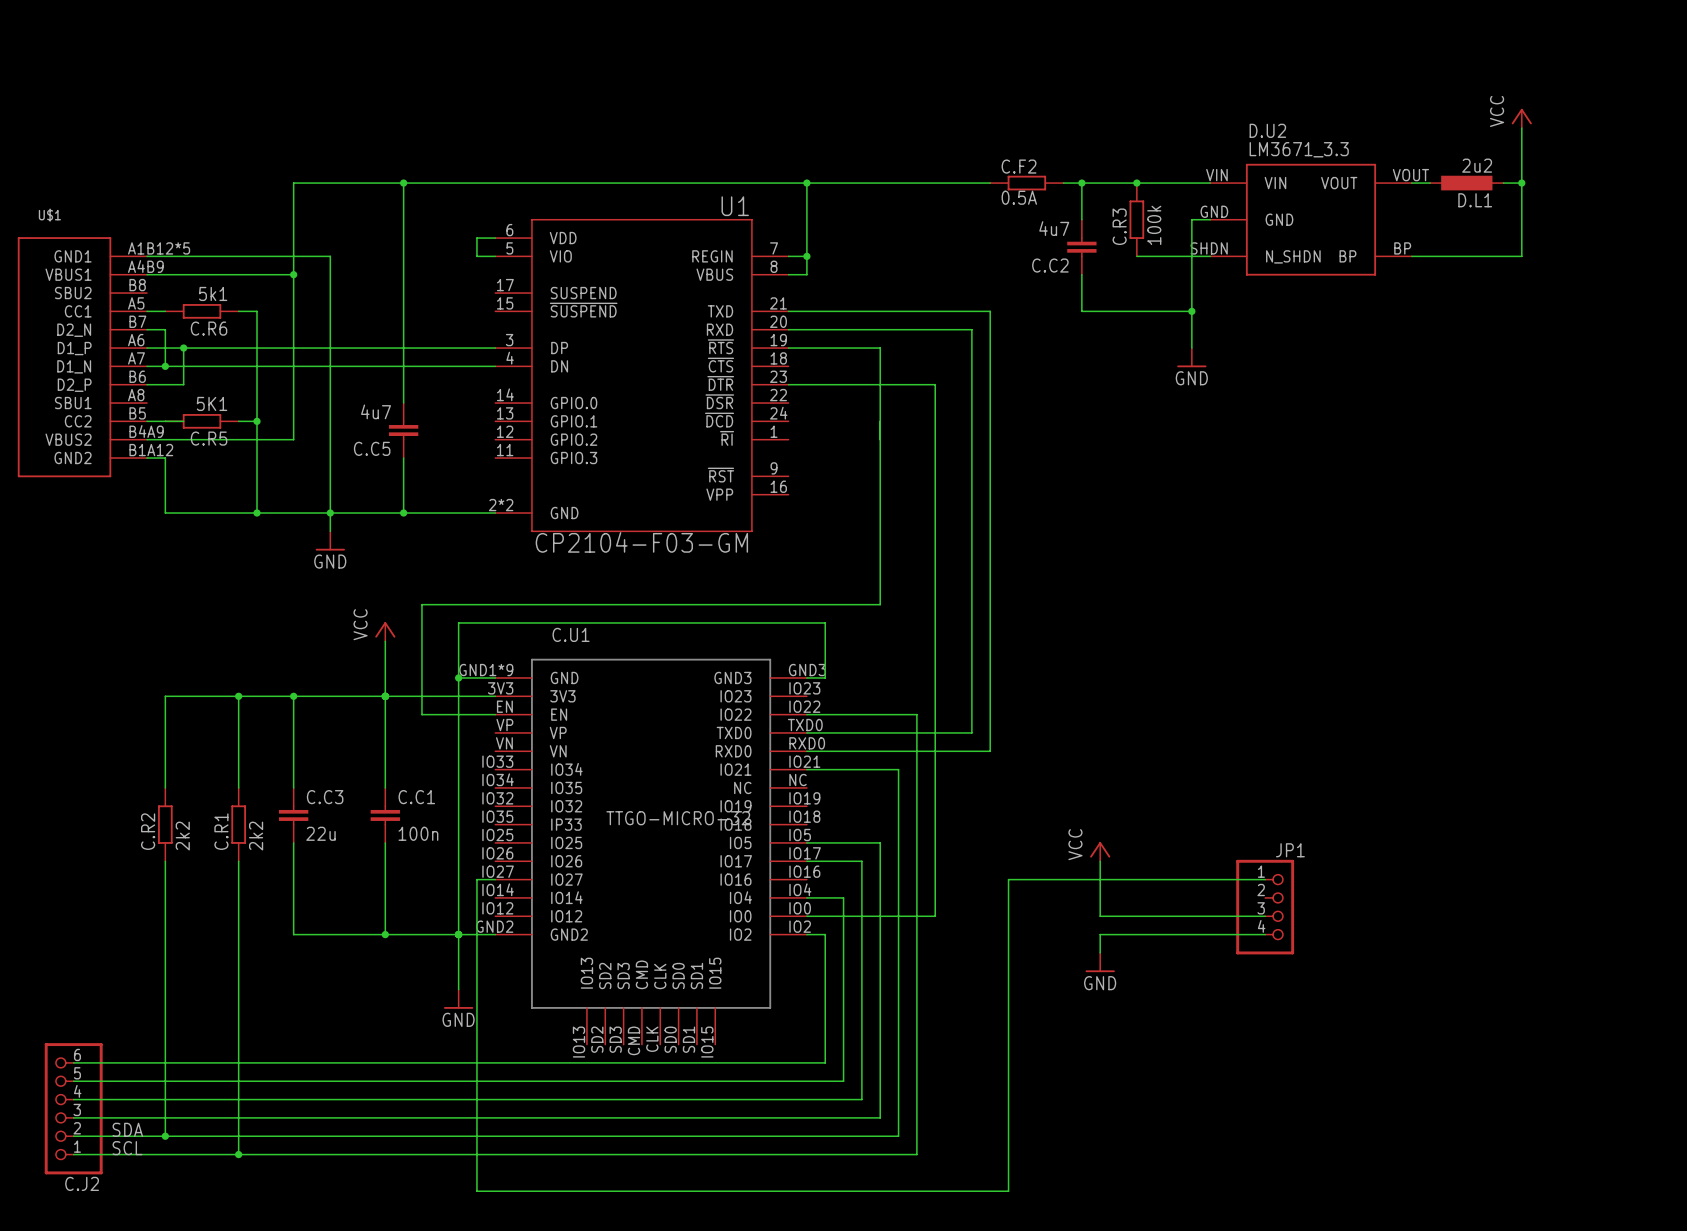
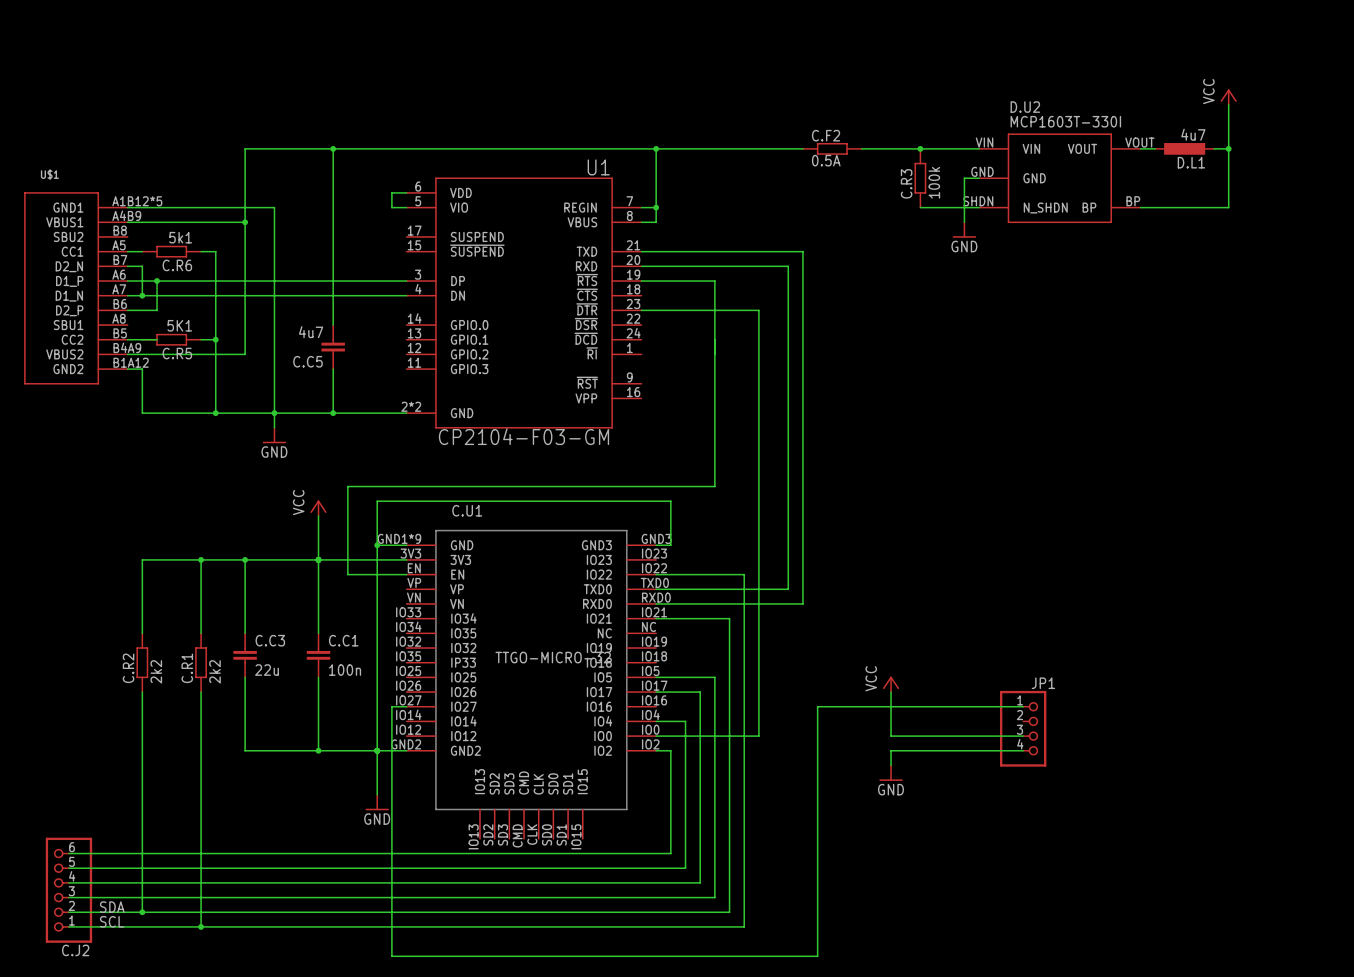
D.U2 value: LM3671_3.3 (1299, 149) -> MCP1603T-330I (1065, 121)
D.L1 value: 2u2 (1477, 165) -> 4u7 (1193, 134)
wire: (1081, 183) (1081, 219) -> none
junction: (1081, 183) -> none
C.C2: 4u7 (1081, 247) -> none
wire: (1081, 274) (1081, 311) (1191, 311) -> none
wire: (1191, 274) (1191, 348) -> none
junction: (1191, 311) -> none
power symbol position: GND (1191, 357) -> GND (964, 229)

